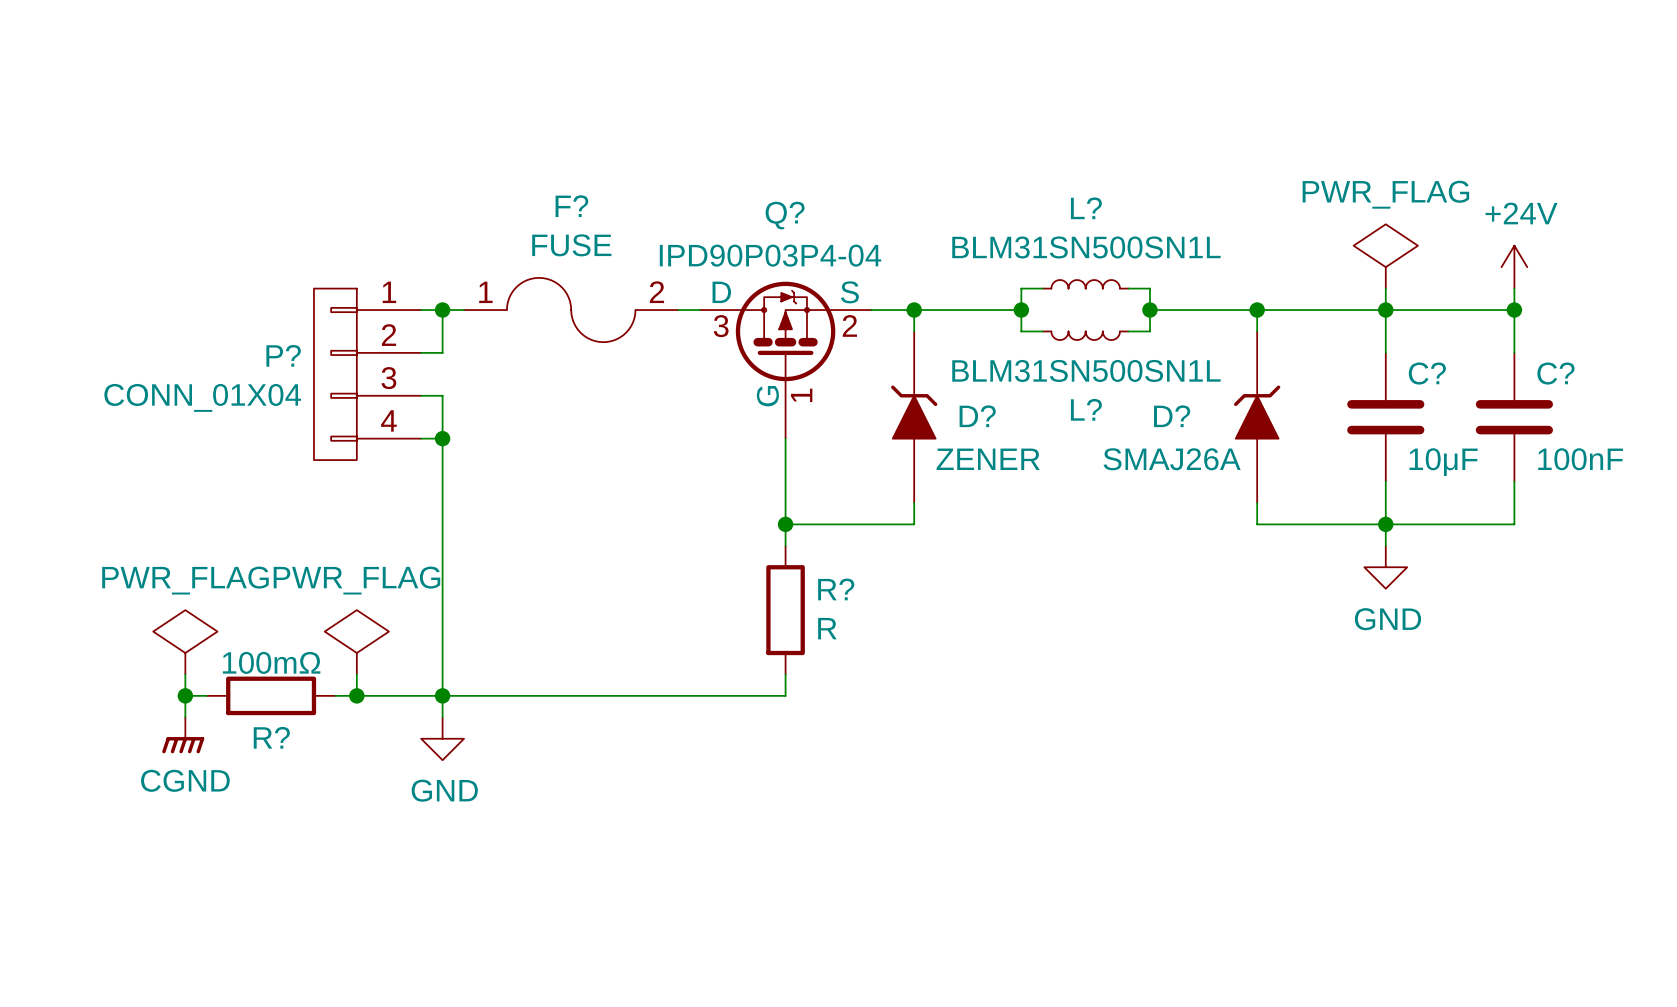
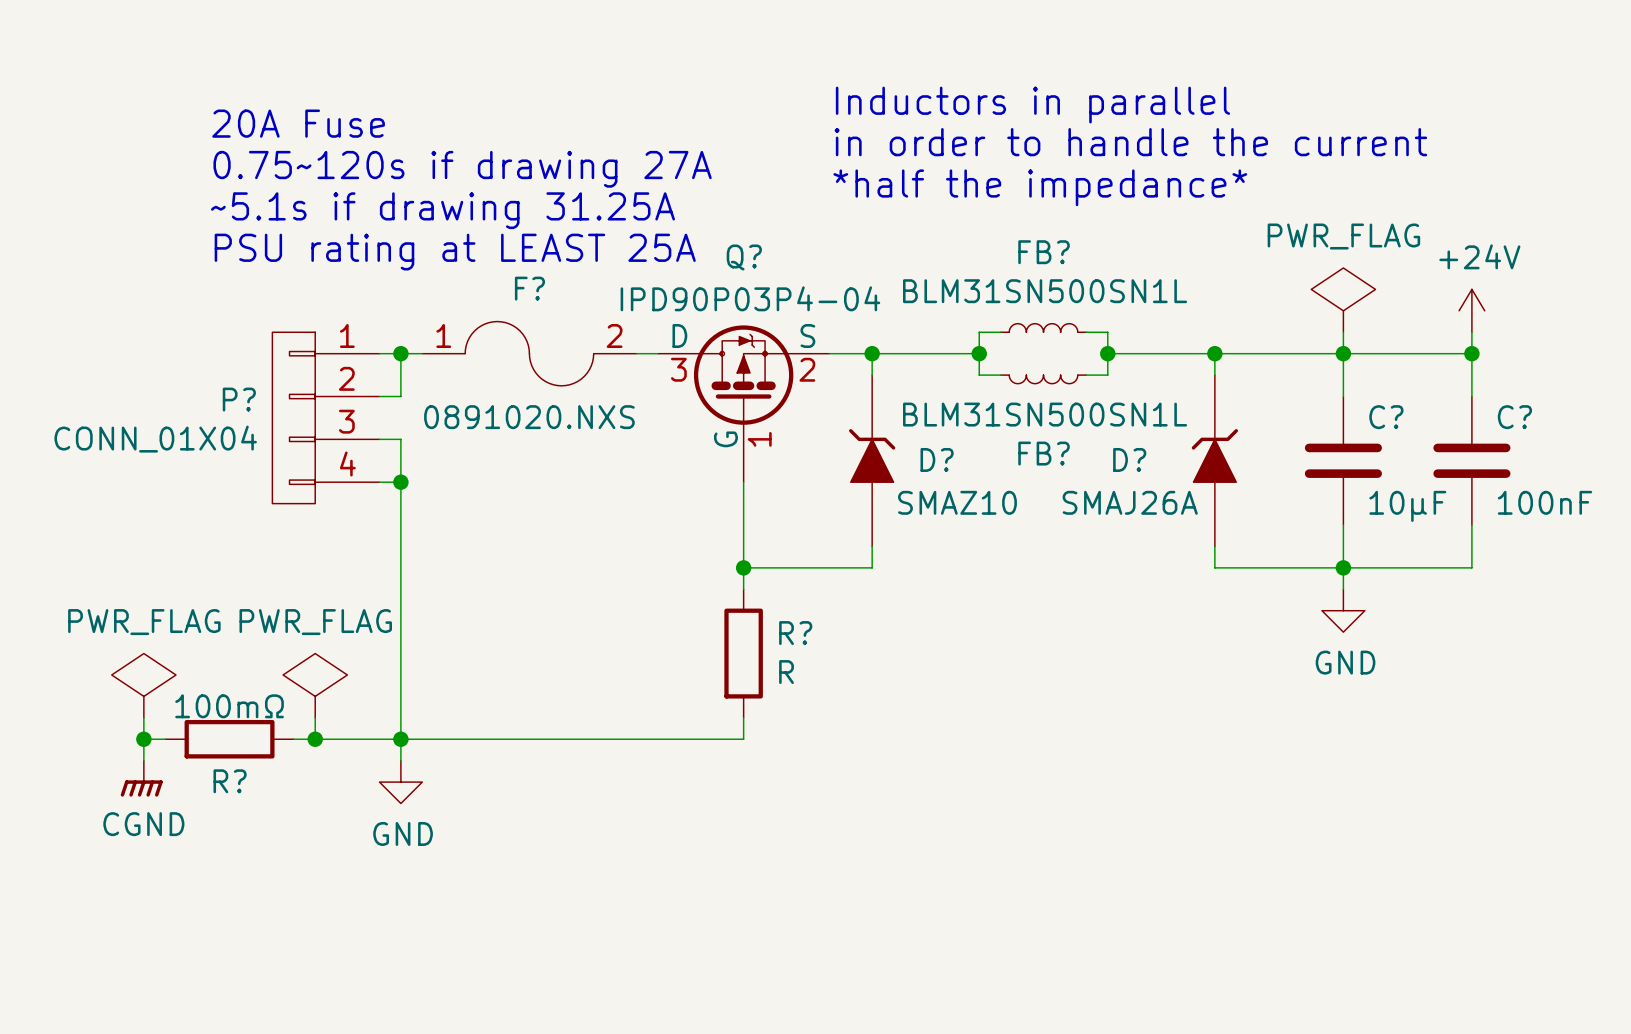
text: none -> Inductors in parallel (1032, 105)
text: none -> 20A Fuse (298, 123)
text: none -> in order to handle the current (1130, 142)
text: none -> 0.75~120s if drawing 27A (462, 169)
text: none -> *half the impedance* (1040, 187)
text: none -> ~5.1s if drawing 31.25A (442, 210)
F? name position: F? (571, 206) -> F? (529, 288)
text: none -> PSU rating at LEAST 25A (455, 252)
L? name: L? (1086, 208) -> FB? (1044, 252)
F? value: FUSE (571, 245) -> 0891020.NXS (529, 417)
L? name: L? (1086, 409) -> FB? (1044, 453)
D? value: ZENER (988, 459) -> SMAZ10 (957, 502)

